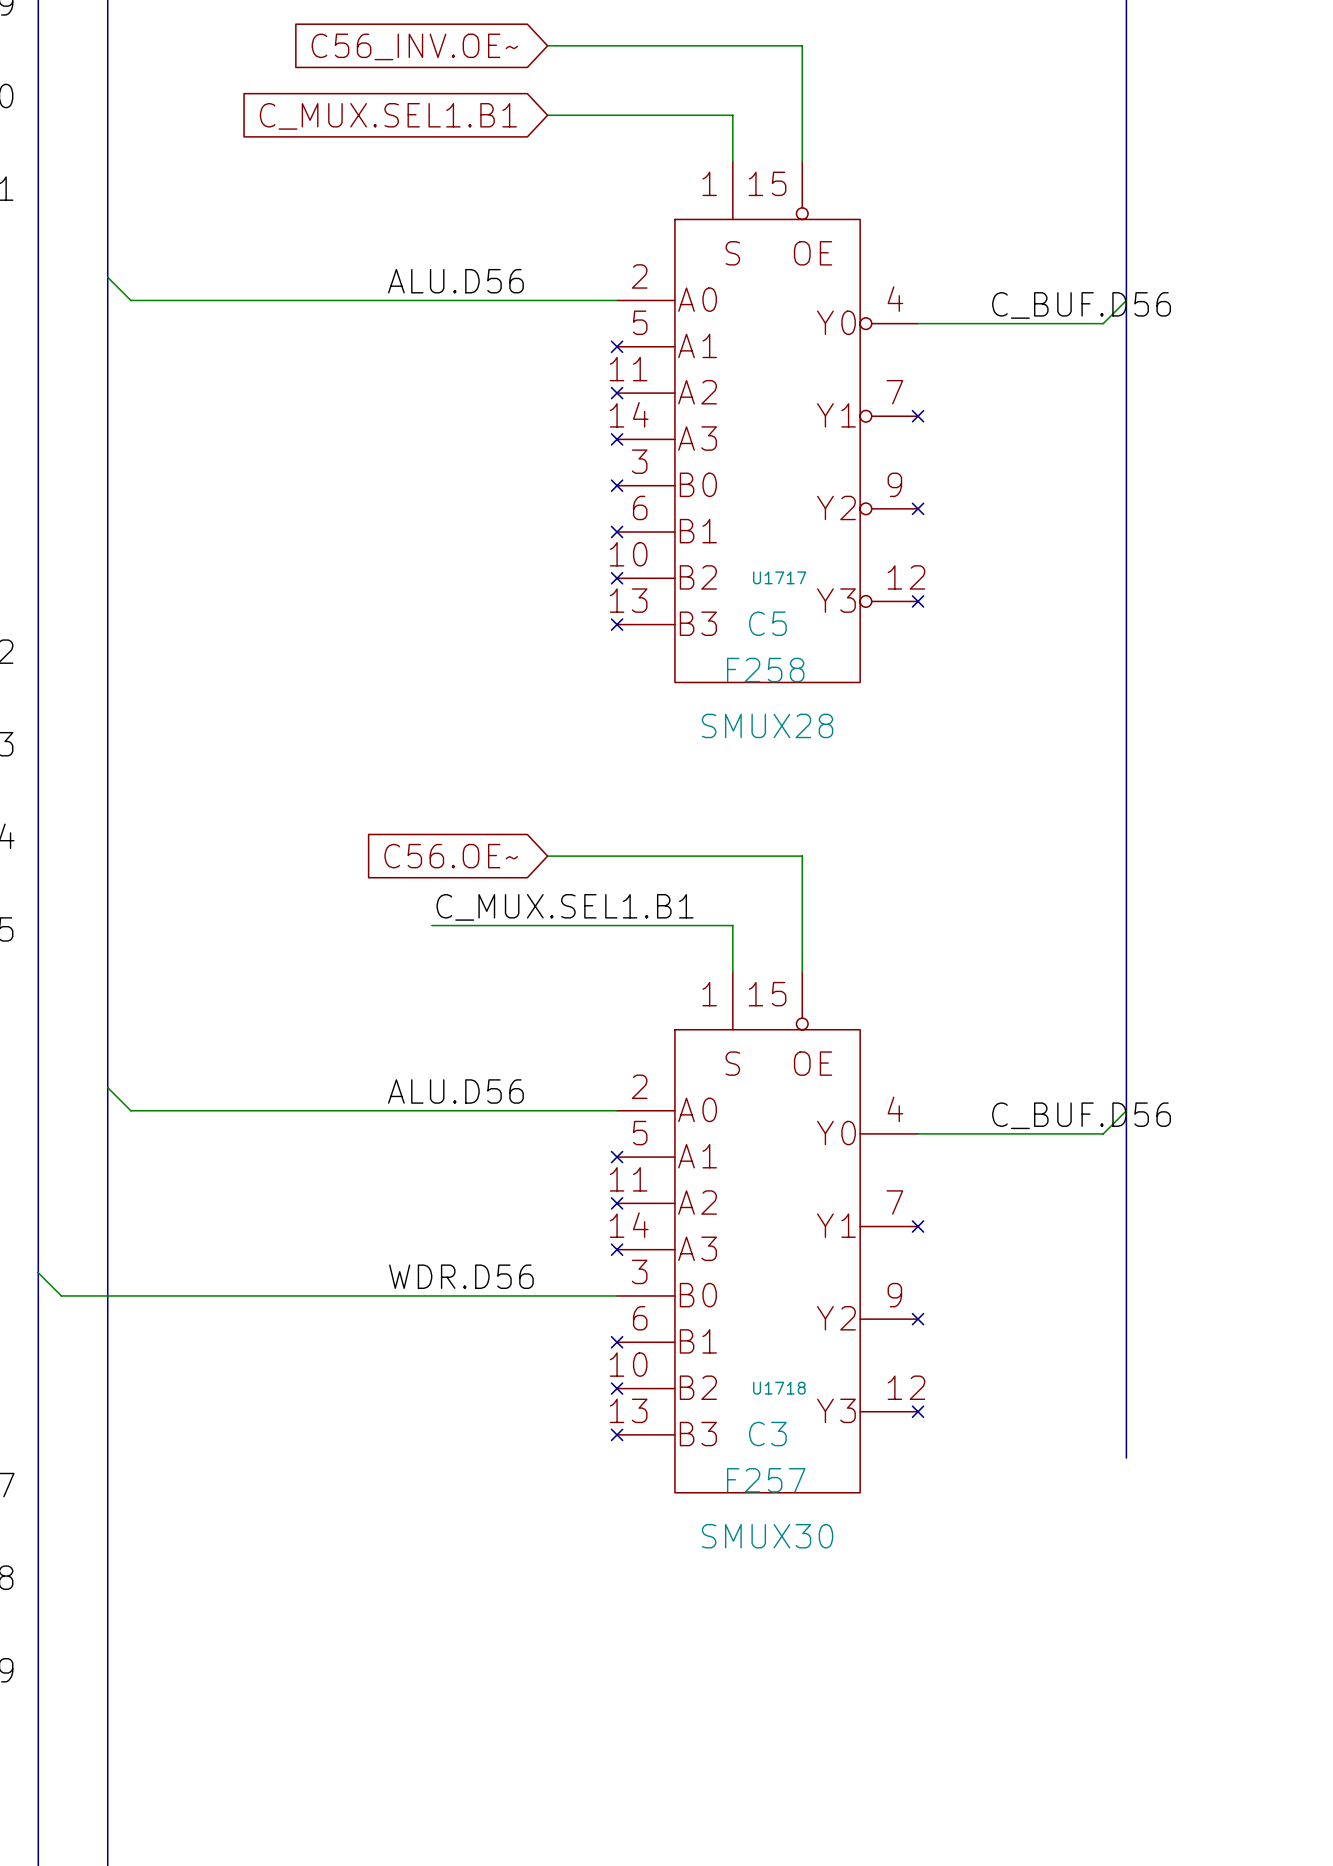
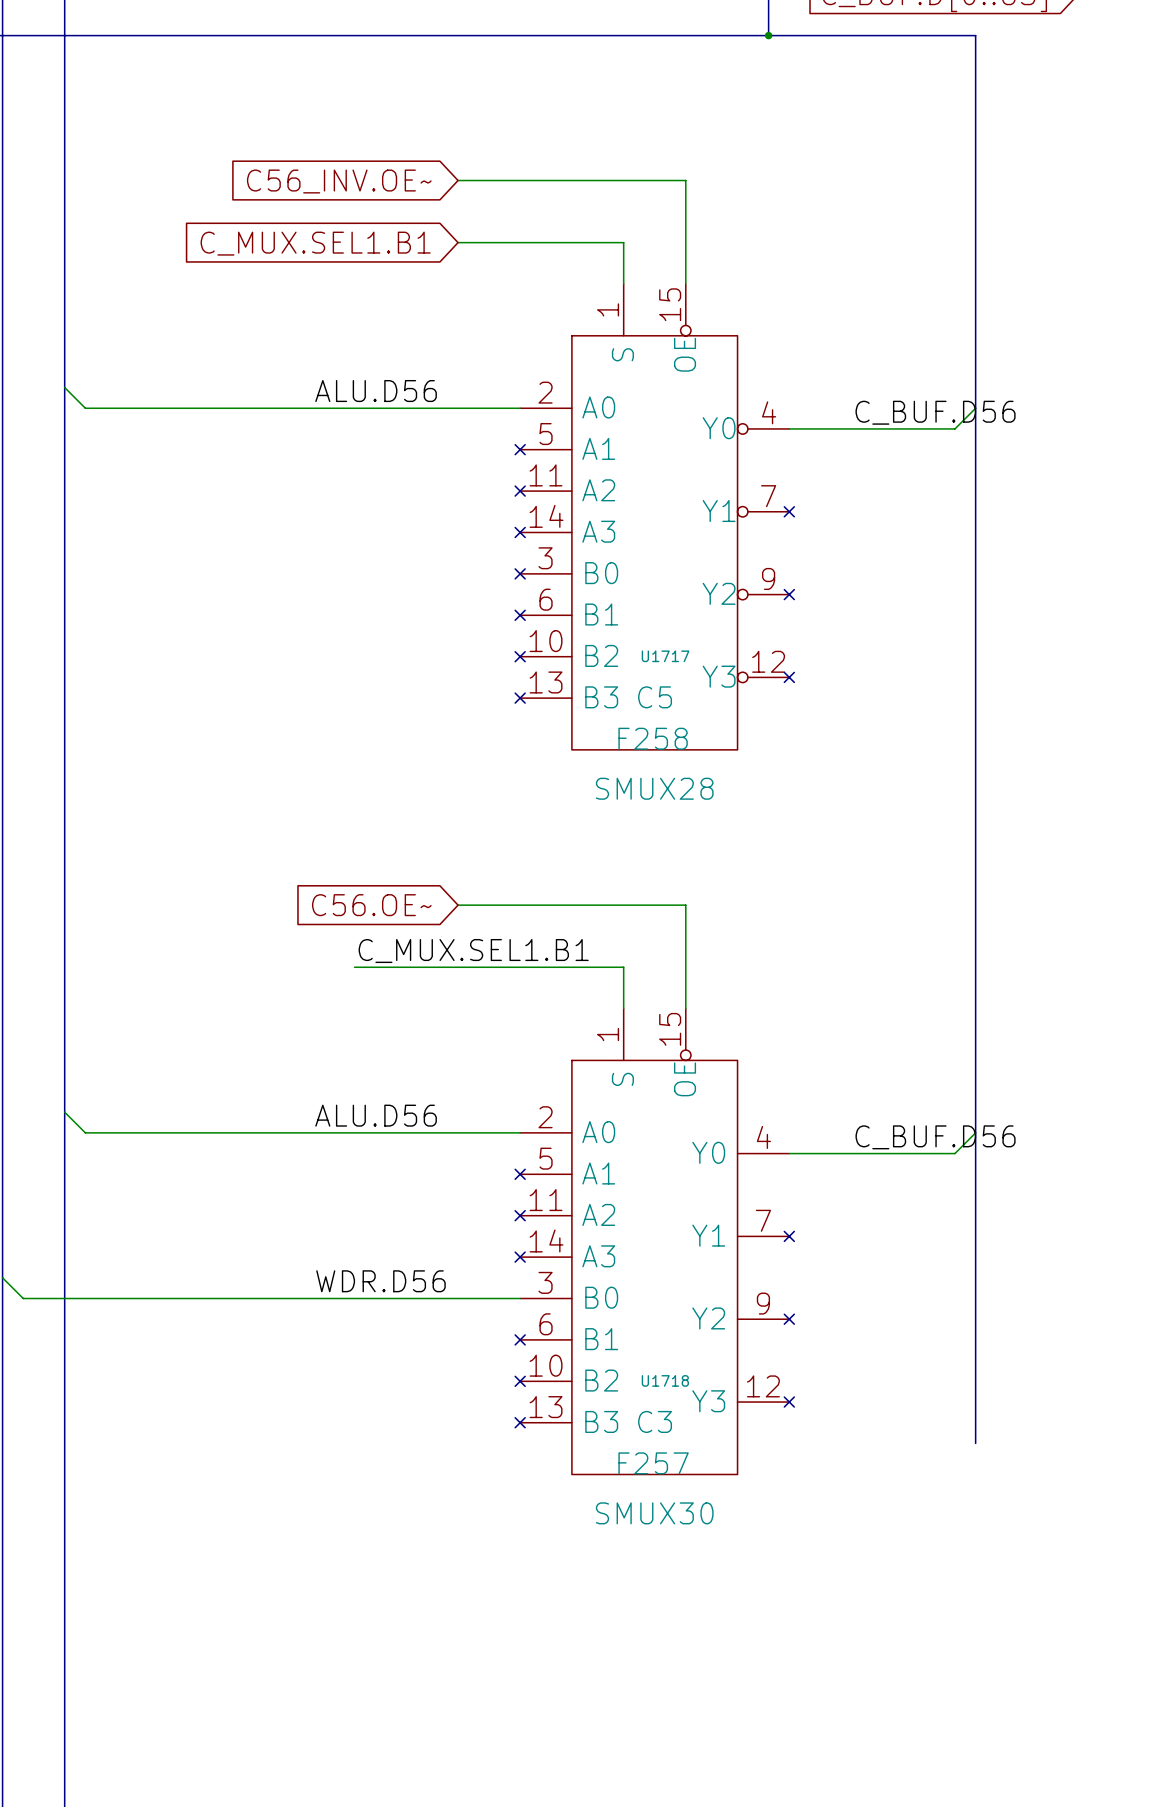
U1717 symbol: [617, 161, 919, 683] -> [520, 284, 790, 750]
U1718 symbol: [617, 971, 919, 1493] -> [520, 1008, 790, 1475]

